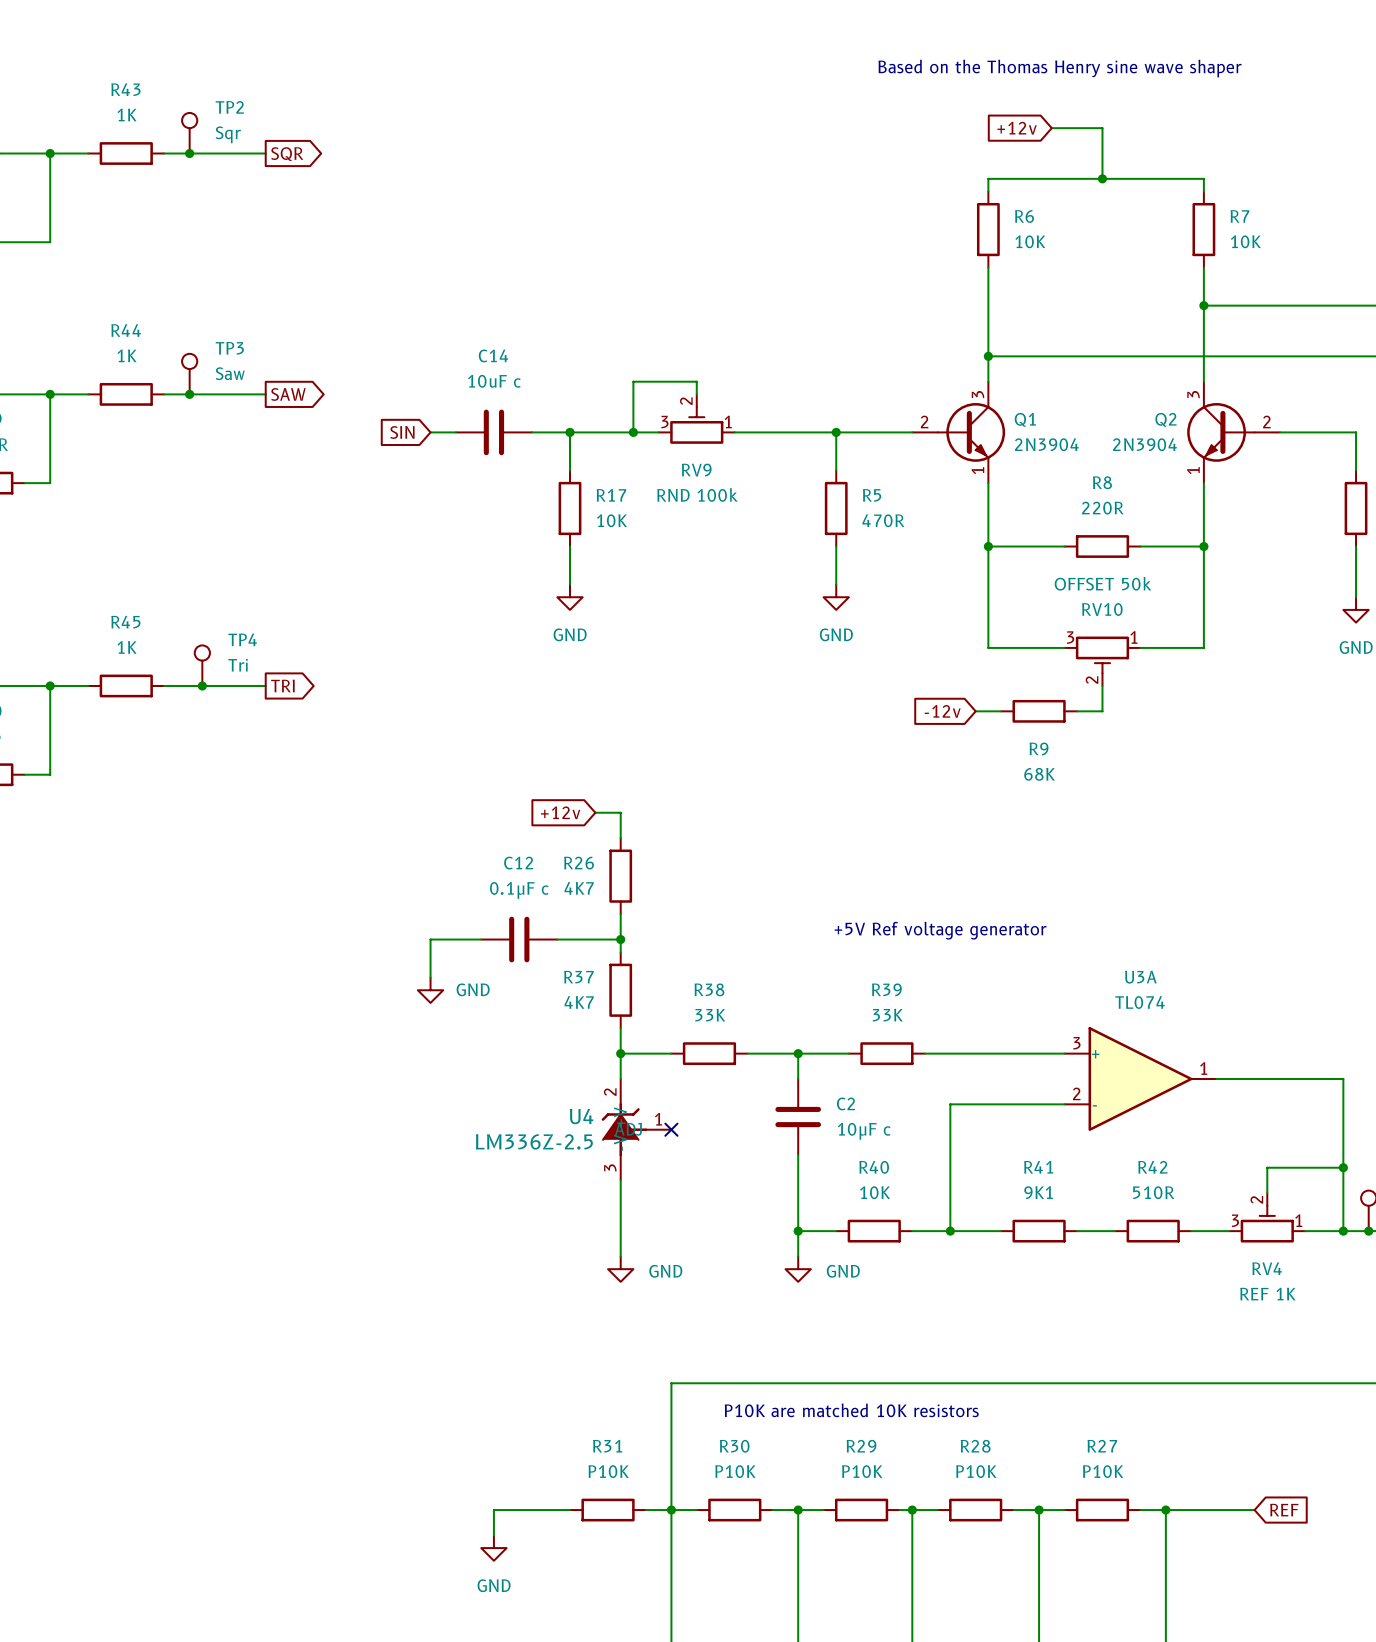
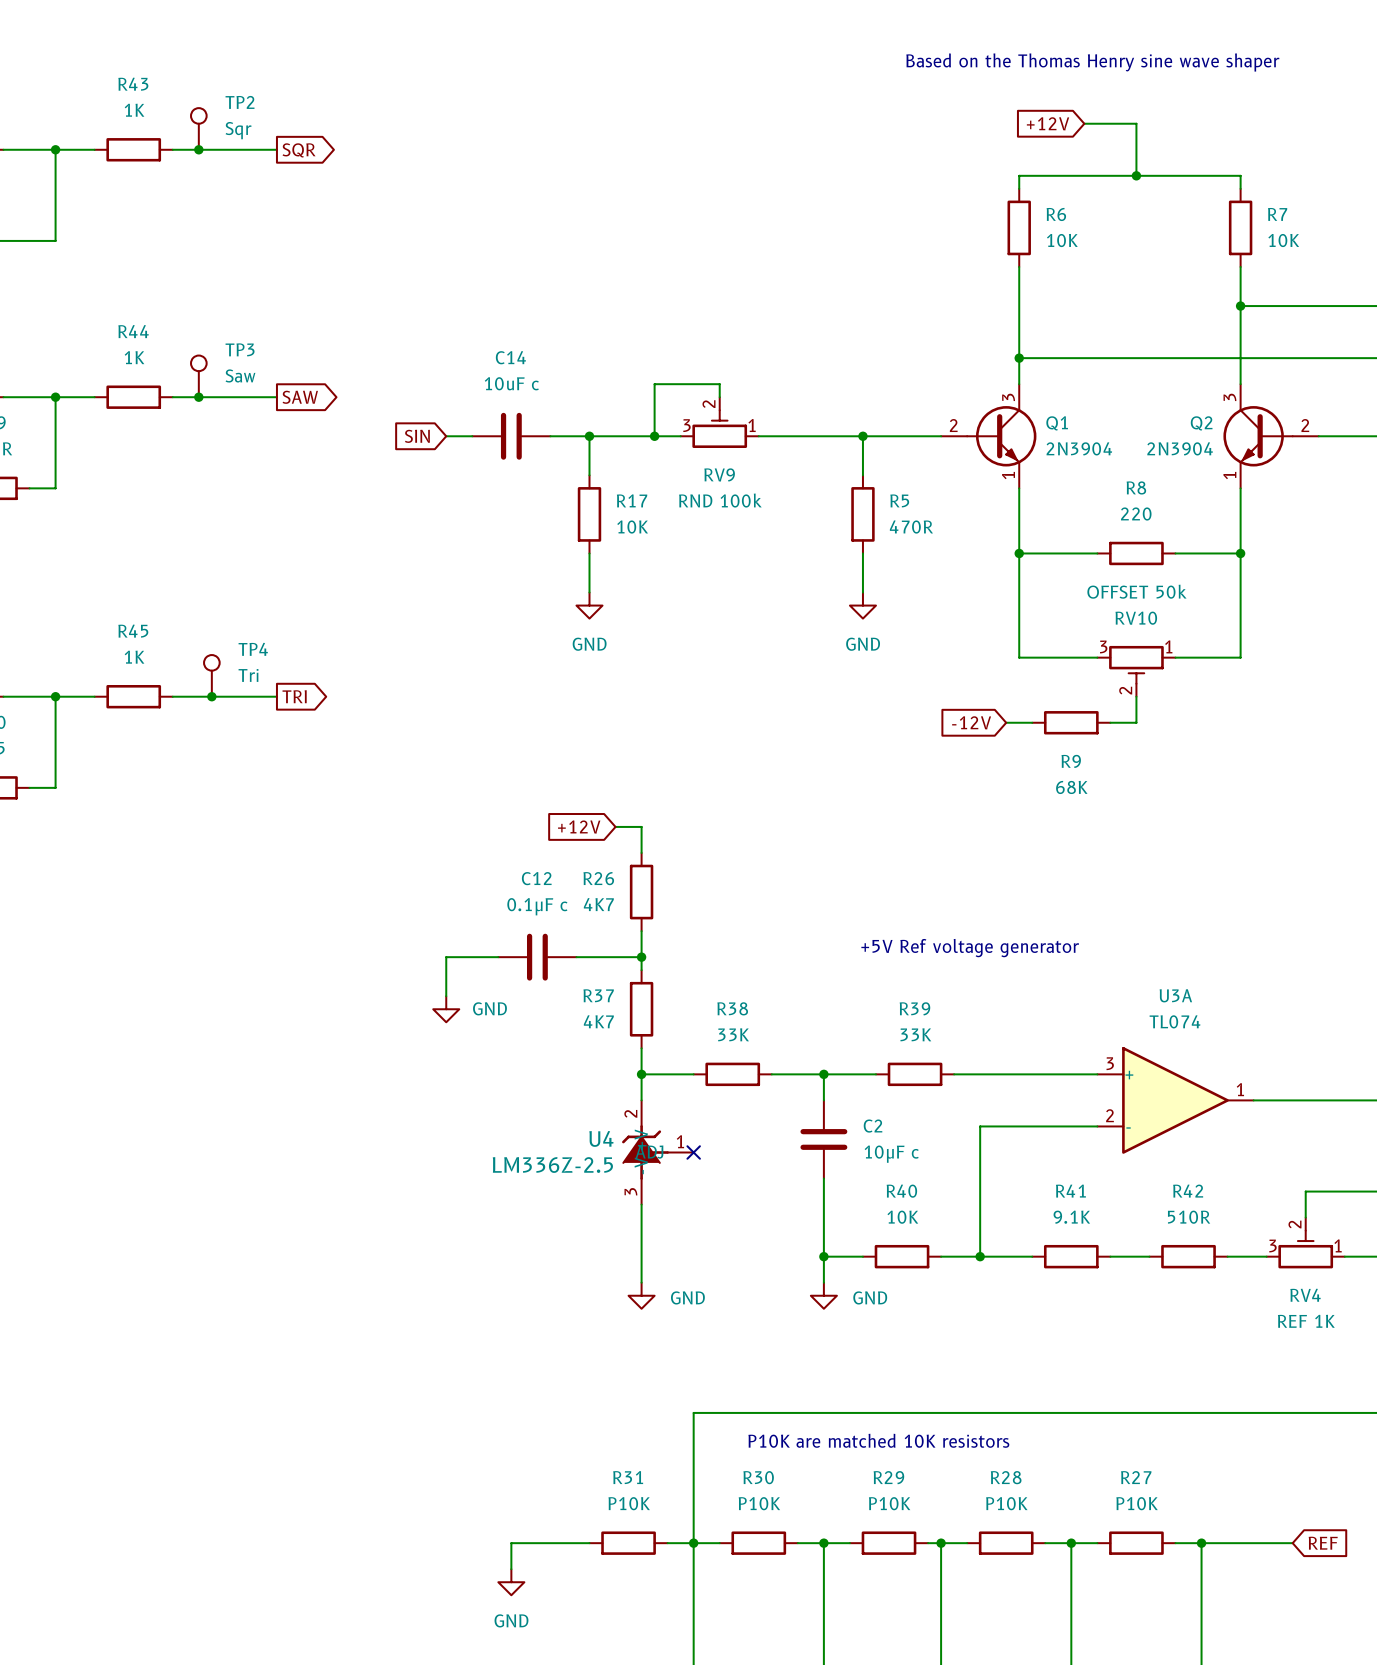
global label: +12v (1017, 128) -> +12V (1048, 123)
R8 value: 220R (1102, 508) -> 220 (1136, 514)
global label: -12v (942, 711) -> -12V (971, 722)
global label: +12v (560, 812) -> +12V (579, 827)
R41 value: 9K1 (1038, 1192) -> 9.1K (1071, 1217)

